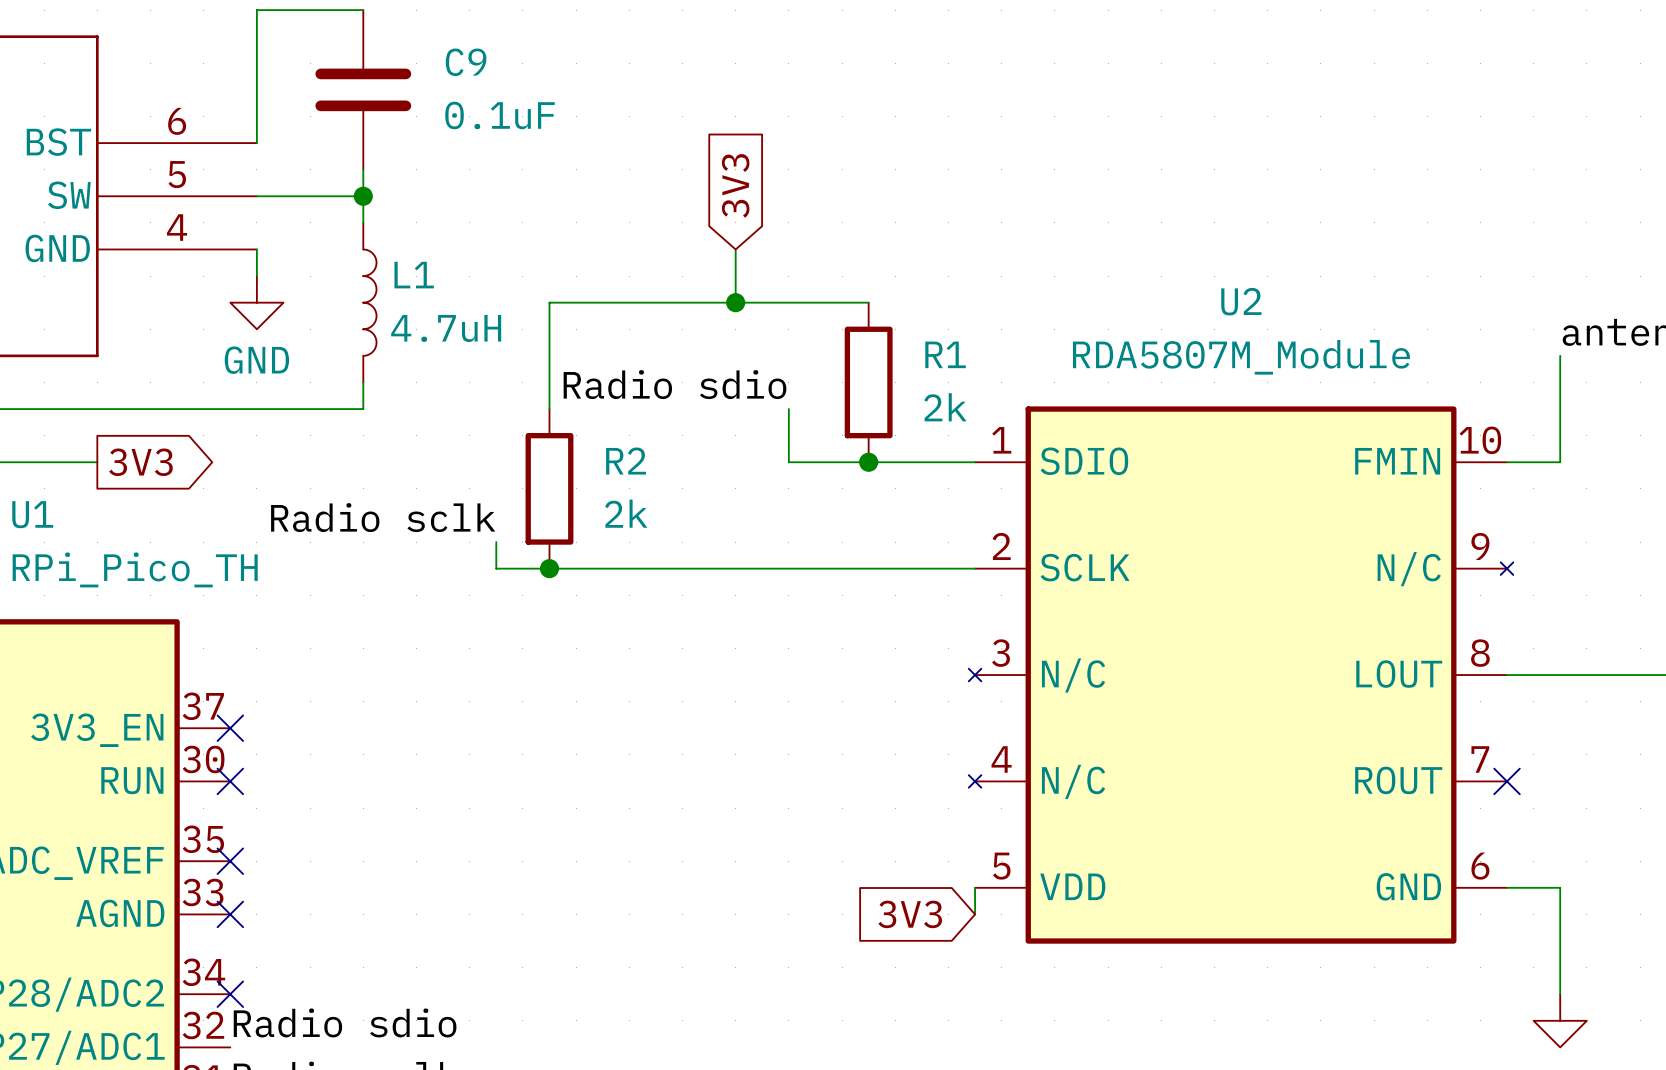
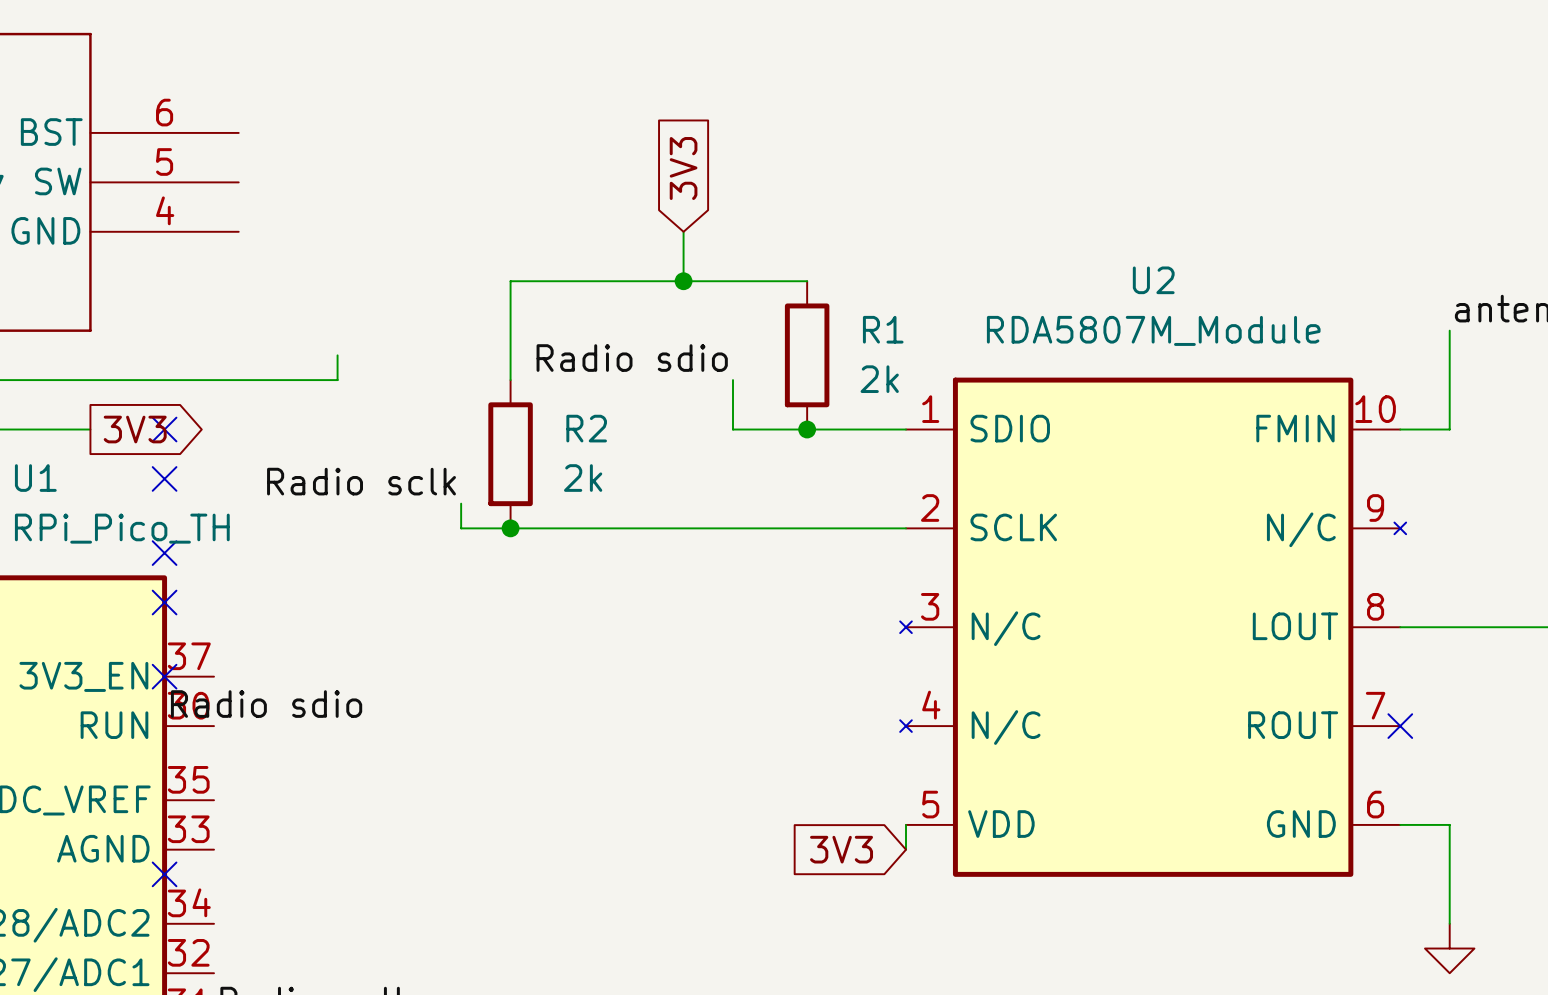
wire: (363, 10) (256, 10) (256, 143) -> none
C9: 0.1uF (363, 89) -> none
wire: (363, 169) (363, 222) -> none
wire: (256, 196) (363, 196) -> none
junction: (363, 196) -> none
wire: (256, 249) (256, 276) -> none
power symbol: GND (256, 302) -> none
L1: 4.7uH (369, 302) -> none
no-connect mark: none -> (164, 429)
no-connect mark: none -> (164, 478)
no-connect mark: none -> (164, 553)
no-connect mark: none -> (164, 602)
no-connect mark: none -> (164, 676)
no-connect mark: (230, 728) -> none
no-connect mark: (230, 781) -> none
no-connect mark: (230, 861) -> none
no-connect mark: (230, 914) -> none
no-connect mark: none -> (164, 874)
no-connect mark: (230, 994) -> none
label position: Radio sdio (345, 1022) -> Radio sdio (266, 704)

